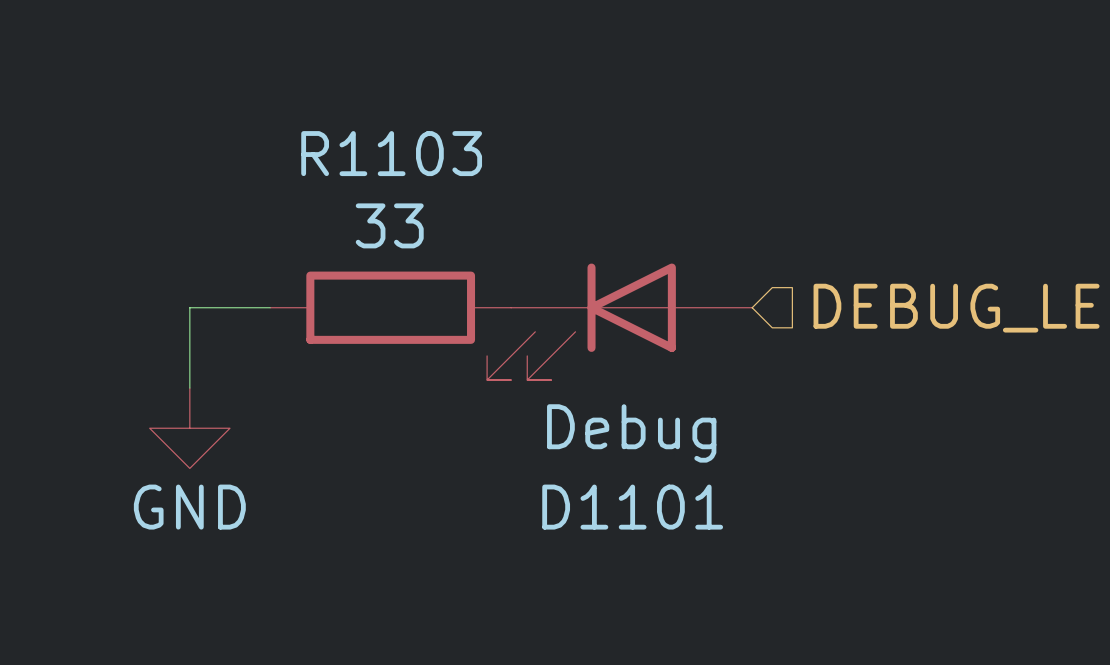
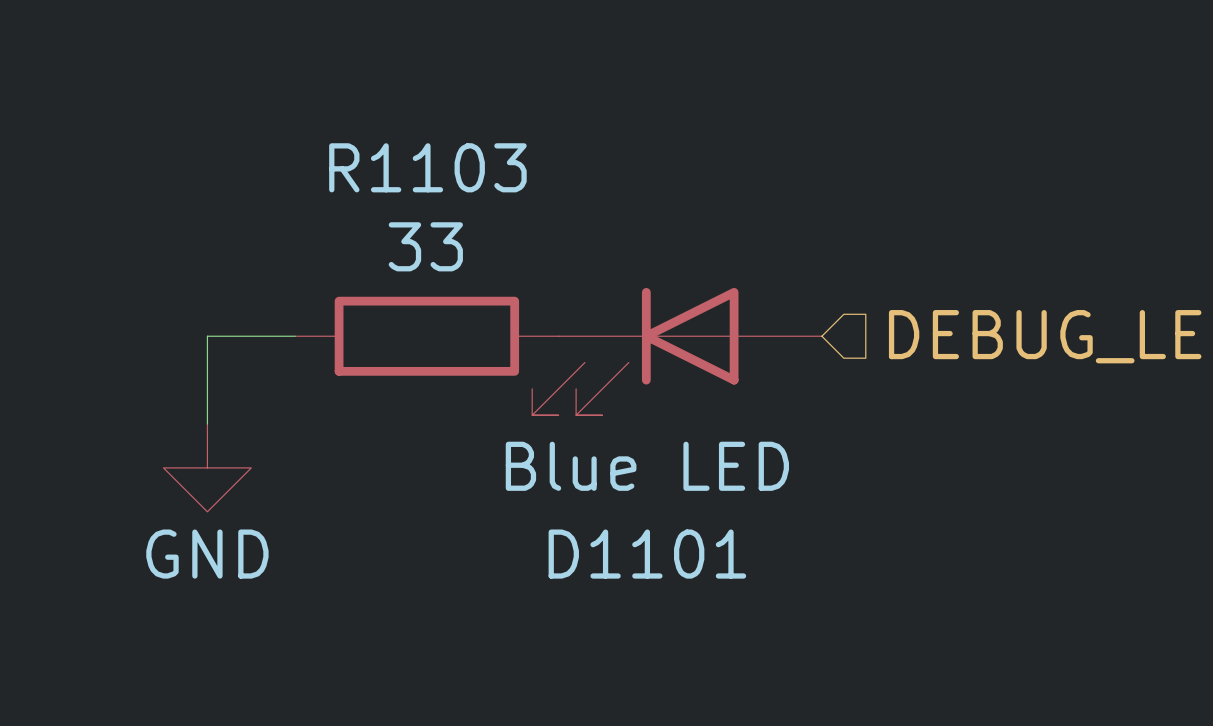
D1101 value: Debug (631, 433) -> Blue LED (647, 466)
D1101 name position: D1101 (632, 507) -> D1101 (647, 554)

